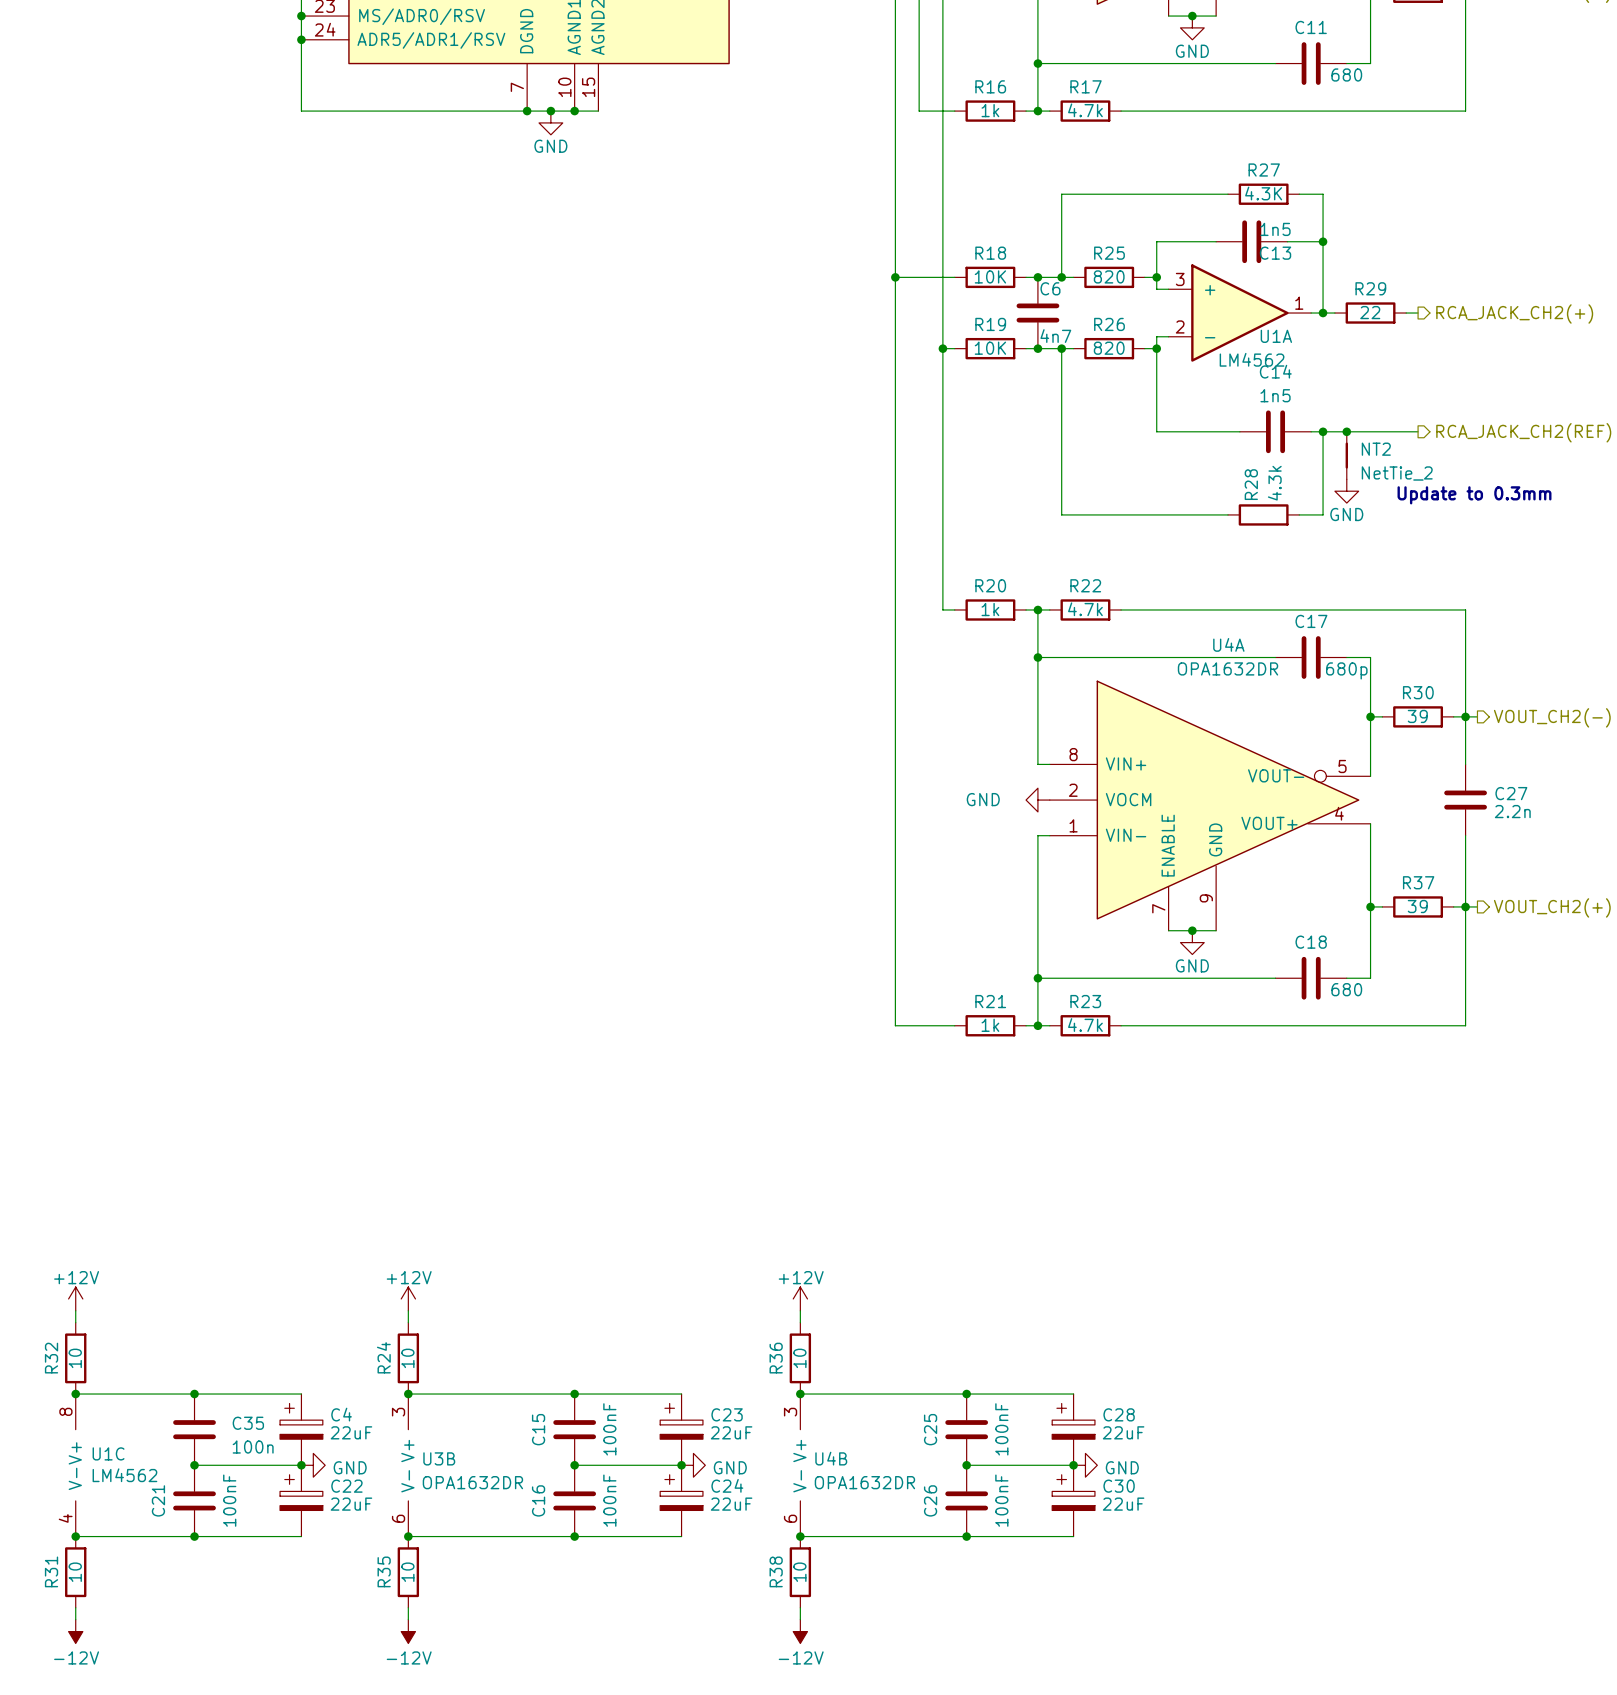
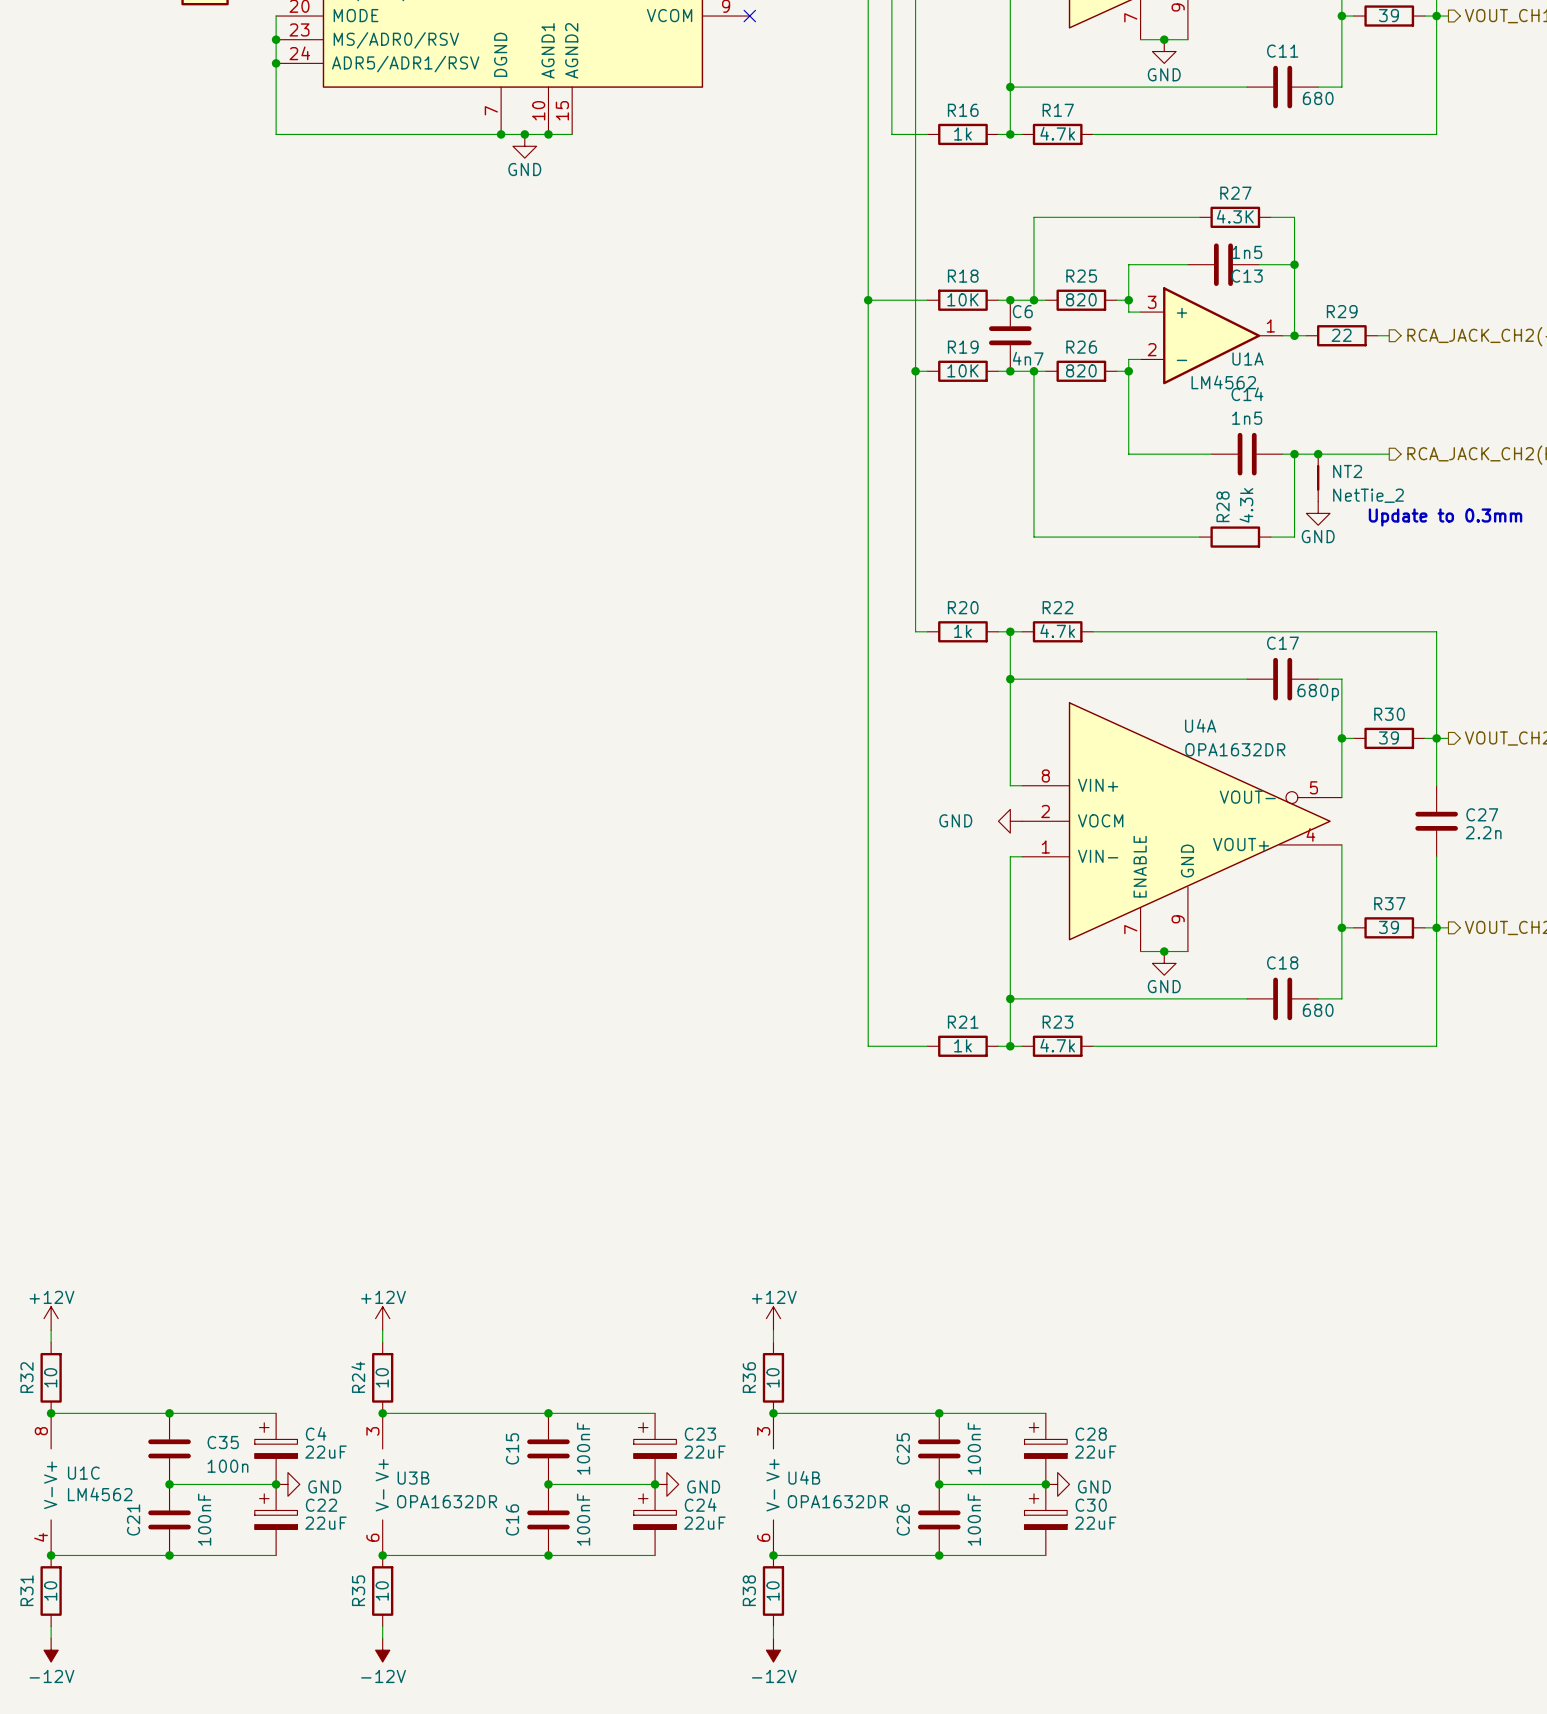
U4A name position: U4A (1228, 644) -> U4A (1200, 725)
U4A value position: OPA1632DR (1228, 668) -> OPA1632DR (1235, 749)

